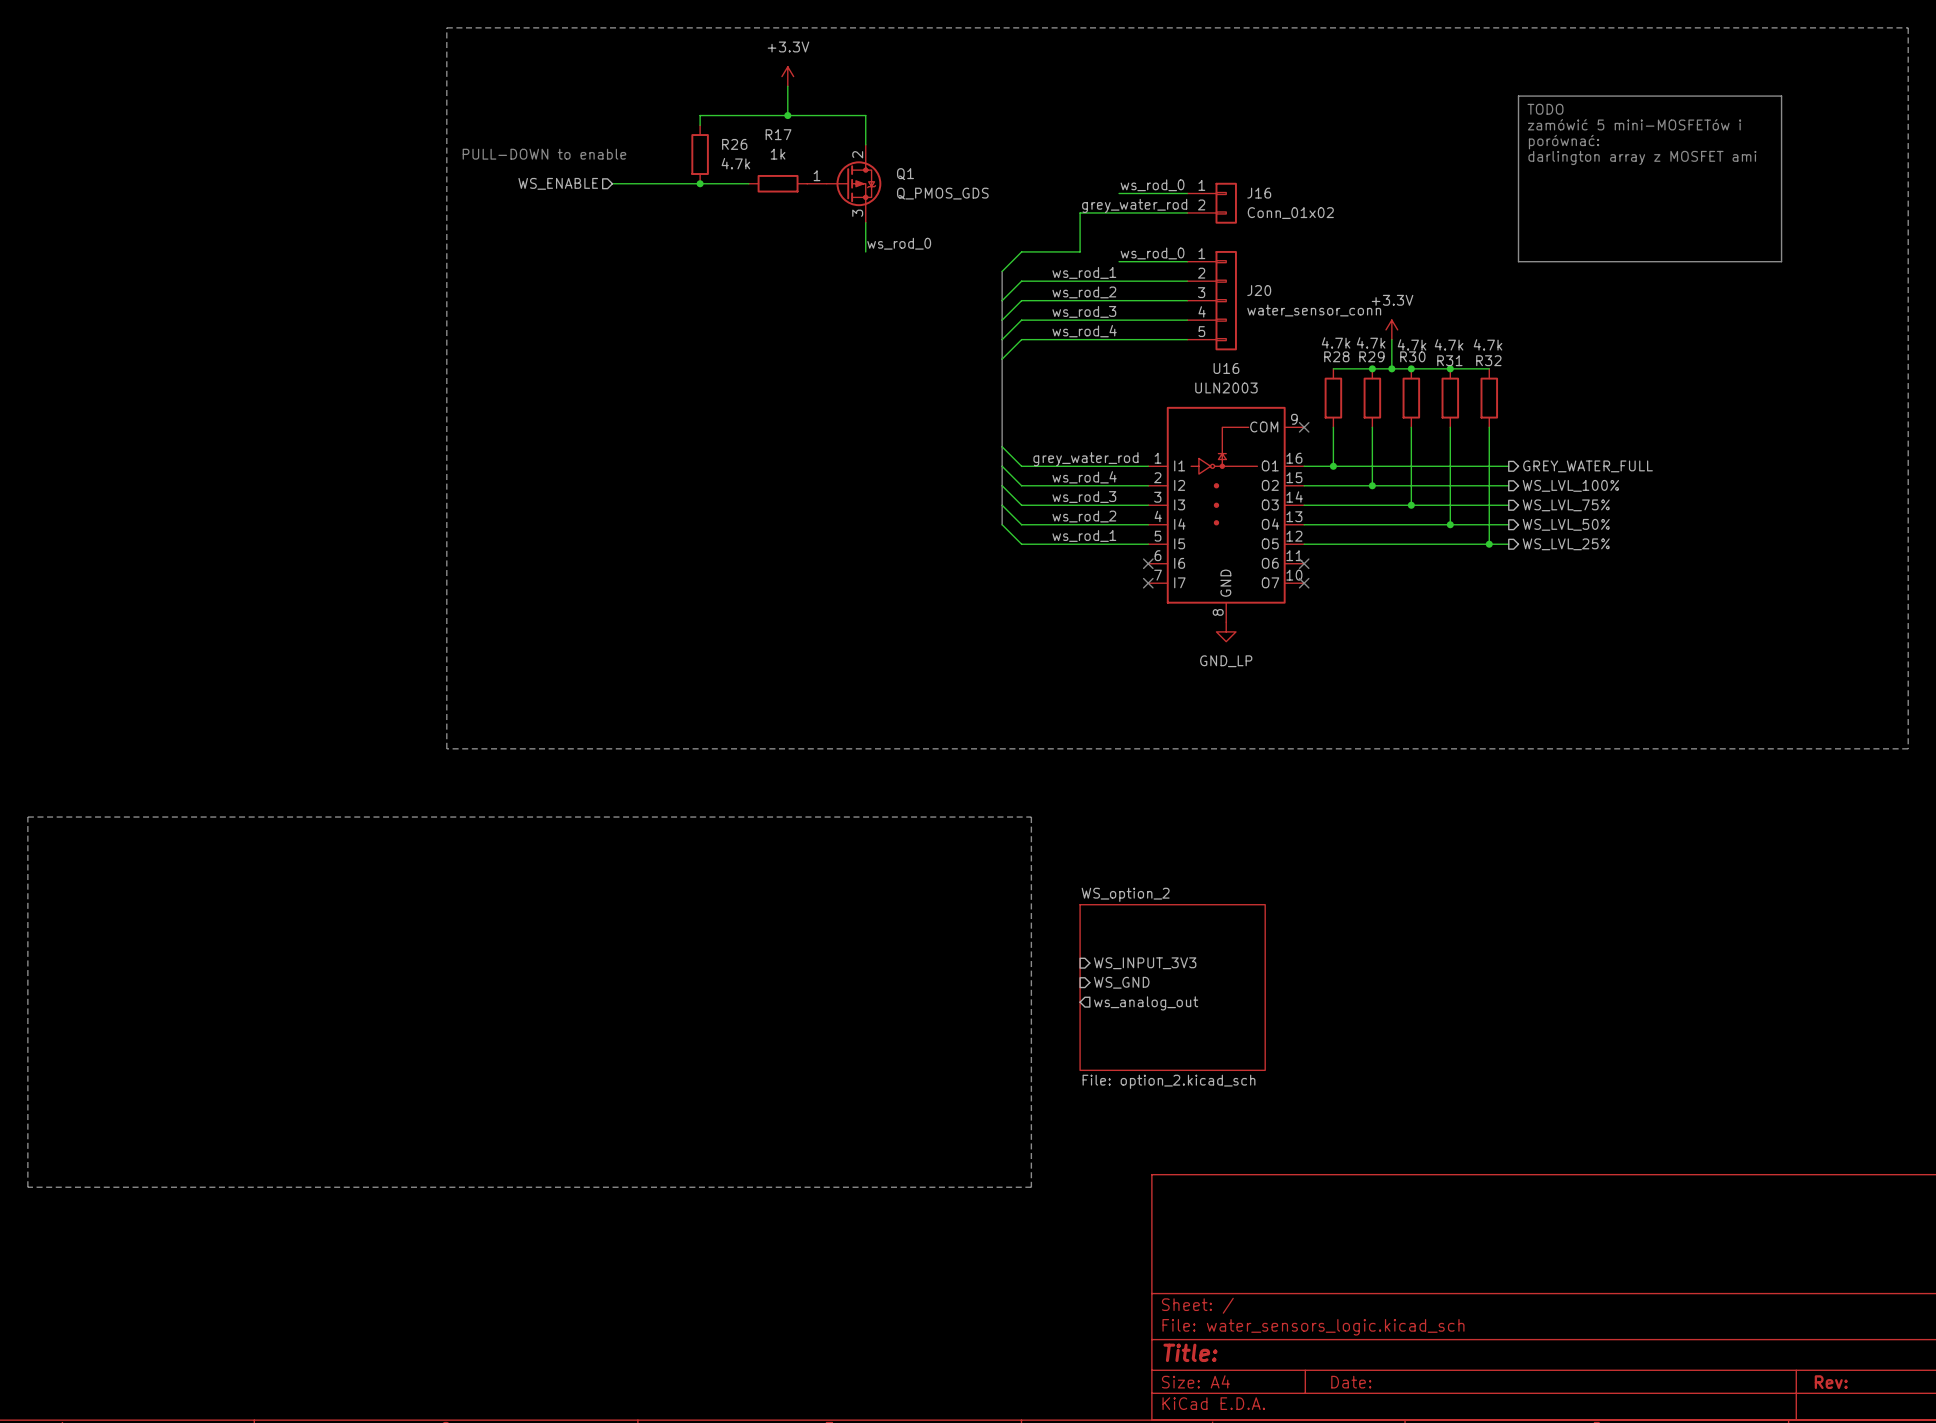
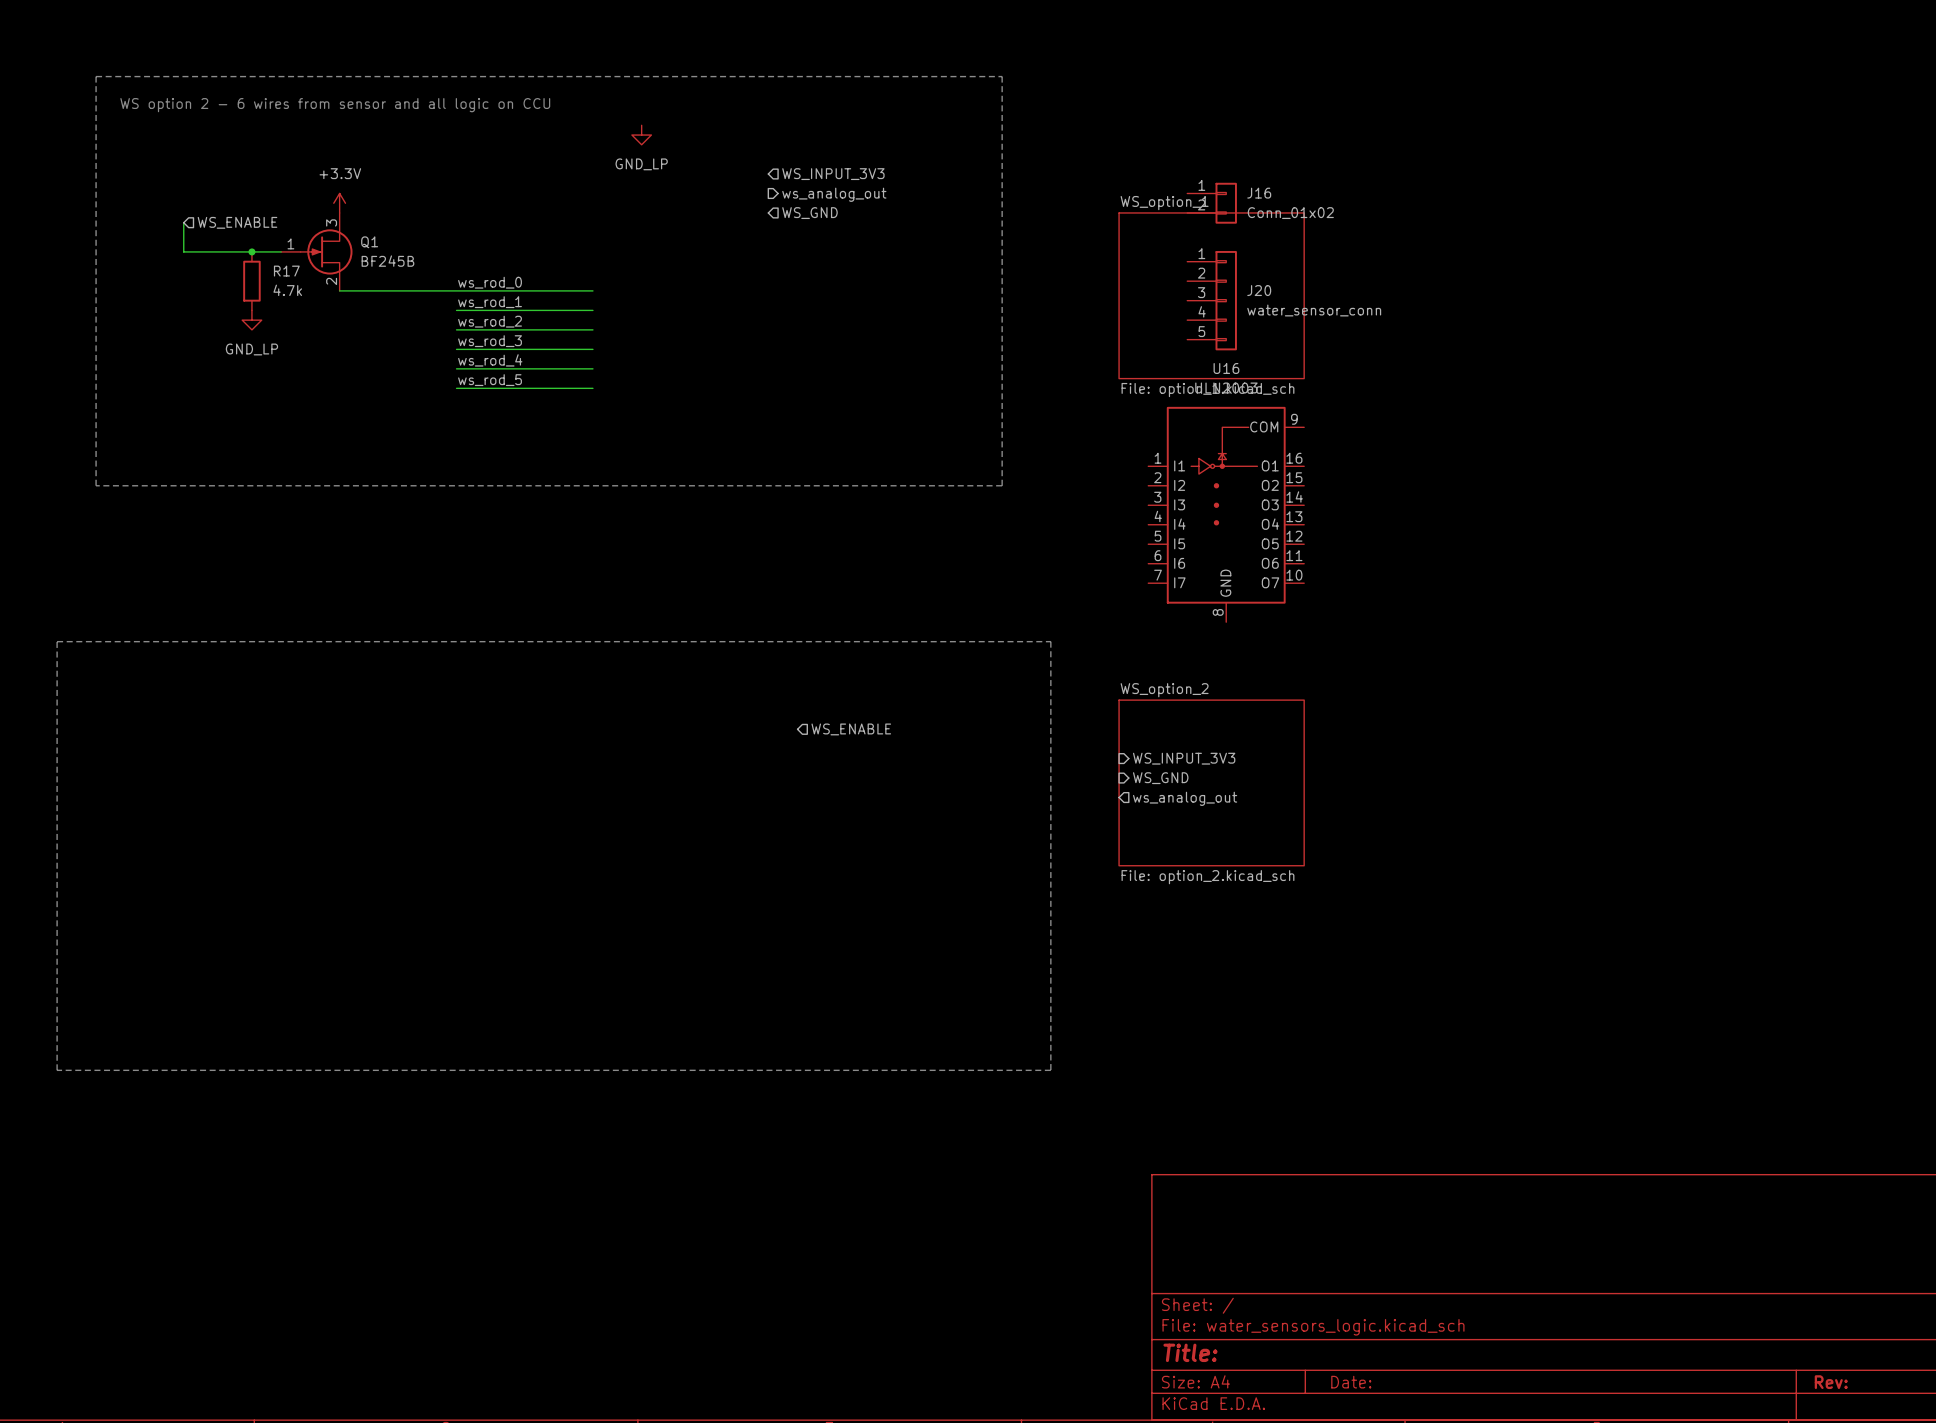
line: (446, 27) (1908, 27) (1908, 748) (446, 748) (446, 27) -> none
line: none -> (96, 76) (1002, 76) (1002, 485) (96, 485) (96, 76)
power symbol: +3.3V (787, 76) -> none
wire: (787, 86) (787, 115) -> none
line: (1518, 96) (1781, 96) (1781, 261) (1518, 261) (1518, 96) -> none
text: none -> WS option 2 - 6 wires from sensor and all logic on CCU (335, 105)
text: TODO (1545, 109) -> none
junction: (787, 115) -> none
text: zamówić 5 mini-MOSFETów i (1634, 124) -> none
wire: (700, 125) (700, 115) (865, 115) (865, 144) -> none
R17 name position: R17 (778, 134) -> R17 (286, 271)
power symbol: none -> GND_LP (641, 135)
text: porównać: (1564, 142) -> none
Q1 symbol: [807, 144, 882, 223] -> [281, 212, 353, 291]
text: PULL-DOWN to enable (544, 154) -> none
R26: 4.7k (700, 154) -> none
R17 value: 1k (778, 154) -> 4.7k (287, 290)
text: darlington array z MOSFET ami (1642, 157) -> none
hierarchical label: none -> WS_INPUT_3V3 (833, 174)
hierarchical label: WS_ENABLE (558, 183) -> none
wire: (612, 183) (748, 183) -> none
junction: (700, 183) -> none
R17 rotation: 0° (778, 183) -> 90° clockwise (251, 281)
R17 position: (778, 183) -> (251, 281)
label: ws_rod_0 (1152, 185) -> none
Q1 value: Q_PMOS_GDS (942, 193) -> BF245B (387, 261)
wire: (1119, 193) (1187, 193) -> none
hierarchical label: none -> ws_analog_out (834, 194)
power symbol: none -> +3.3V (339, 203)
label: grey_water_rod (1134, 205) -> none
wire: (1187, 212) (1080, 212) (1080, 251) (1021, 251) (1002, 271) -> none
hierarchical label: none -> WS_GND (809, 213)
wire: none -> (183, 222) (183, 251) (281, 251)
hierarchical label: none -> WS_ENABLE (237, 222)
wire: (865, 222) (865, 251) -> none
label: ws_rod_0 (899, 243) -> none
junction: none -> (251, 251)
label: ws_rod_0 (1152, 253) -> none
wire: (1119, 261) (1187, 261) -> none
bus: (1002, 271) (1002, 524) -> none
label: ws_rod_1 (1084, 272) -> none
wire: (1187, 281) (1021, 281) (1002, 300) -> none
label: none -> ws_rod_0 (490, 282)
wire: none -> (339, 290) (592, 290)
label: ws_rod_2 (1084, 292) -> none
sheet WS_option_1: none -> File: option_1.kicad_sch (1211, 295)
wire: (1187, 300) (1021, 300) (1002, 320) -> none
label: none -> ws_rod_1 (490, 302)
wire: none -> (456, 310) (592, 310)
label: ws_rod_3 (1084, 311) -> none
power symbol: none -> GND_LP (251, 320)
wire: (1187, 320) (1021, 320) (1002, 339) -> none
label: none -> ws_rod_2 (490, 321)
wire: none -> (456, 329) (592, 329)
power symbol: +3.3V (1391, 329) -> none
label: ws_rod_4 (1084, 331) -> none
wire: (1187, 339) (1021, 339) (1002, 359) -> none
wire: (1391, 339) (1391, 368) -> none
label: none -> ws_rod_3 (490, 341)
wire: none -> (456, 349) (592, 349)
label: none -> ws_rod_4 (490, 360)
wire: none -> (456, 368) (592, 368)
wire: (1333, 368) (1489, 368) -> none
junction: (1372, 368) -> none
junction: (1391, 368) -> none
junction: (1411, 368) -> none
junction: (1450, 368) -> none
label: none -> ws_rod_5 (490, 380)
wire: none -> (456, 388) (592, 388)
R28: 4.7k (1333, 398) -> none
R29: 4.7k (1372, 398) -> none
R30: 4.7k (1411, 398) -> none
R31: 4.7k (1450, 398) -> none
R32: 4.7k (1489, 398) -> none
no-connect mark: (1304, 427) -> none
wire: (1333, 427) (1333, 466) -> none
wire: (1372, 427) (1372, 485) -> none
wire: (1411, 427) (1411, 505) -> none
wire: (1450, 427) (1450, 524) -> none
wire: (1489, 427) (1489, 544) -> none
wire: (1002, 446) (1021, 466) (1148, 466) -> none
label: grey_water_rod (1085, 459) -> none
wire: (1002, 466) (1021, 485) (1148, 485) -> none
wire: (1304, 466) (1508, 466) -> none
junction: (1333, 466) -> none
hierarchical label: GREY_WATER_FULL (1588, 466) -> none
label: ws_rod_4 (1084, 477) -> none
wire: (1002, 485) (1021, 505) (1148, 505) -> none
wire: (1304, 485) (1508, 485) -> none
junction: (1372, 485) -> none
hierarchical label: WS_LVL_100% (1570, 485) -> none
label: ws_rod_3 (1084, 497) -> none
wire: (1002, 505) (1021, 524) (1148, 524) -> none
wire: (1304, 505) (1508, 505) -> none
junction: (1411, 505) -> none
hierarchical label: WS_LVL_75% (1566, 505) -> none
label: ws_rod_2 (1084, 516) -> none
wire: (1002, 524) (1021, 544) (1148, 544) -> none
wire: (1304, 524) (1508, 524) -> none
junction: (1450, 524) -> none
hierarchical label: WS_LVL_50% (1566, 524) -> none
label: ws_rod_1 (1084, 536) -> none
wire: (1304, 544) (1508, 544) -> none
junction: (1489, 544) -> none
hierarchical label: WS_LVL_25% (1566, 544) -> none
no-connect mark: (1148, 563) -> none
no-connect mark: (1304, 563) -> none
no-connect mark: (1148, 583) -> none
no-connect mark: (1304, 583) -> none
power symbol: GND_LP (1226, 631) -> none
line: none -> (57, 641) (1050, 641) (1050, 1070) (57, 1070) (57, 641)
hierarchical label: none -> WS_ENABLE (851, 729)
sheet pin: none -> WS_INPUT_3V3 (1184, 758)
sheet pin: none -> WS_GND (1160, 778)
sheet pin: none -> ws_analog_out (1185, 798)
line: (27, 817) (1031, 817) (1031, 1187) (27, 1187) (27, 817) -> none
sheet pin: WS_INPUT_3V3 (1145, 963) -> none
sheet pin: WS_GND (1121, 982) -> none
sheet WS_option_2 position: (1172, 987) -> (1211, 782)
sheet pin: ws_analog_out (1146, 1003) -> none

